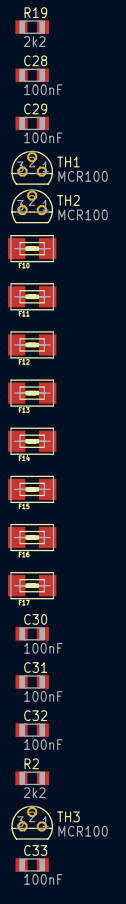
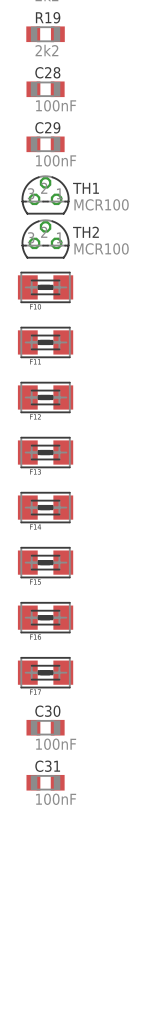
C32: 100nF (32, 730) -> none
R2: 2k2 (32, 778) -> none
TH3: MCR100 (32, 822) -> none
C33: 100nF (32, 864) -> none

